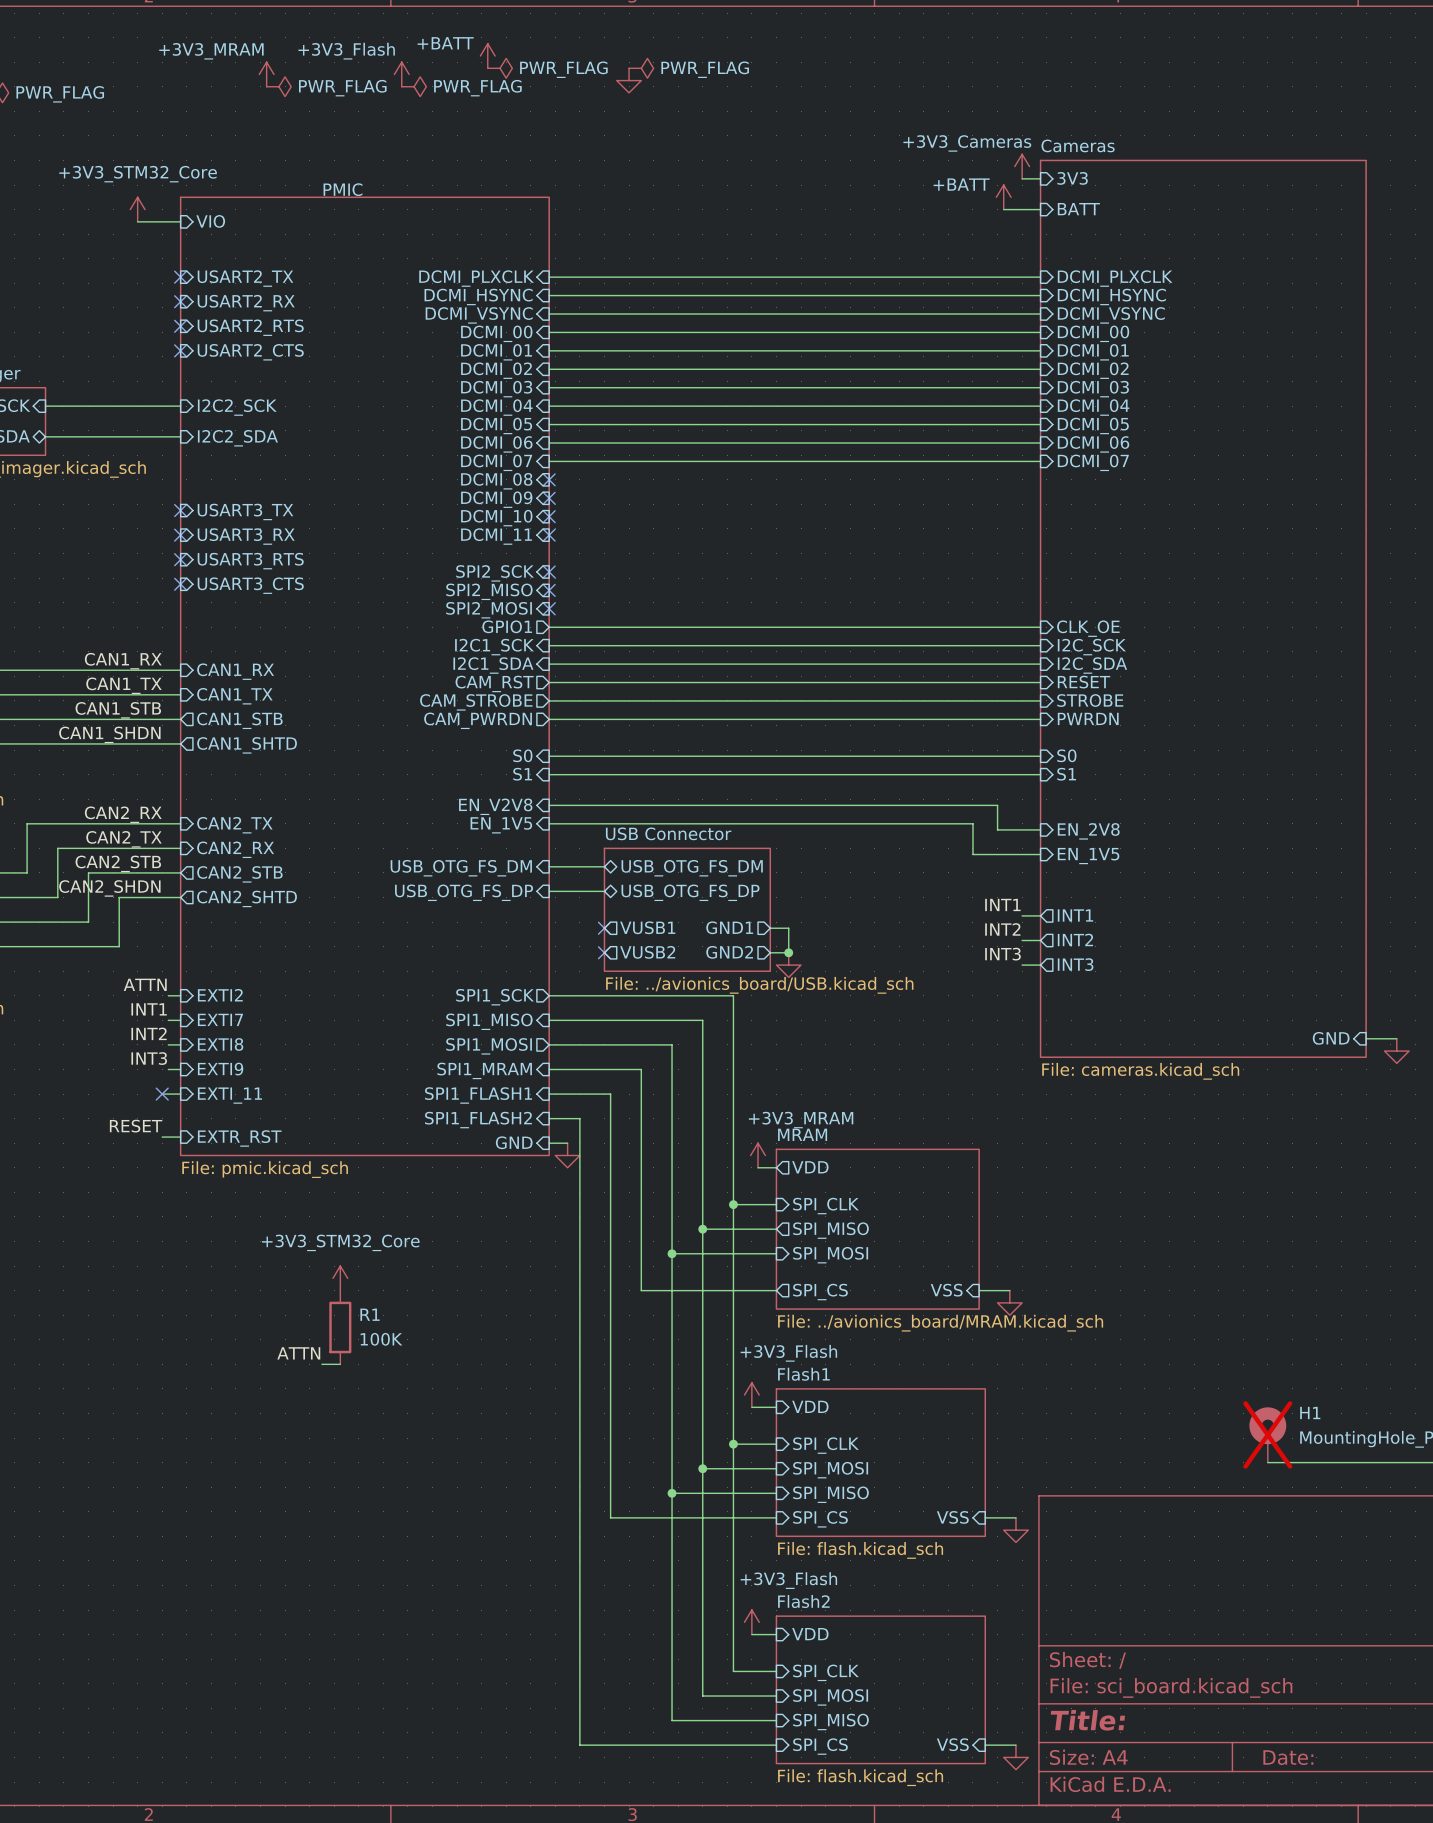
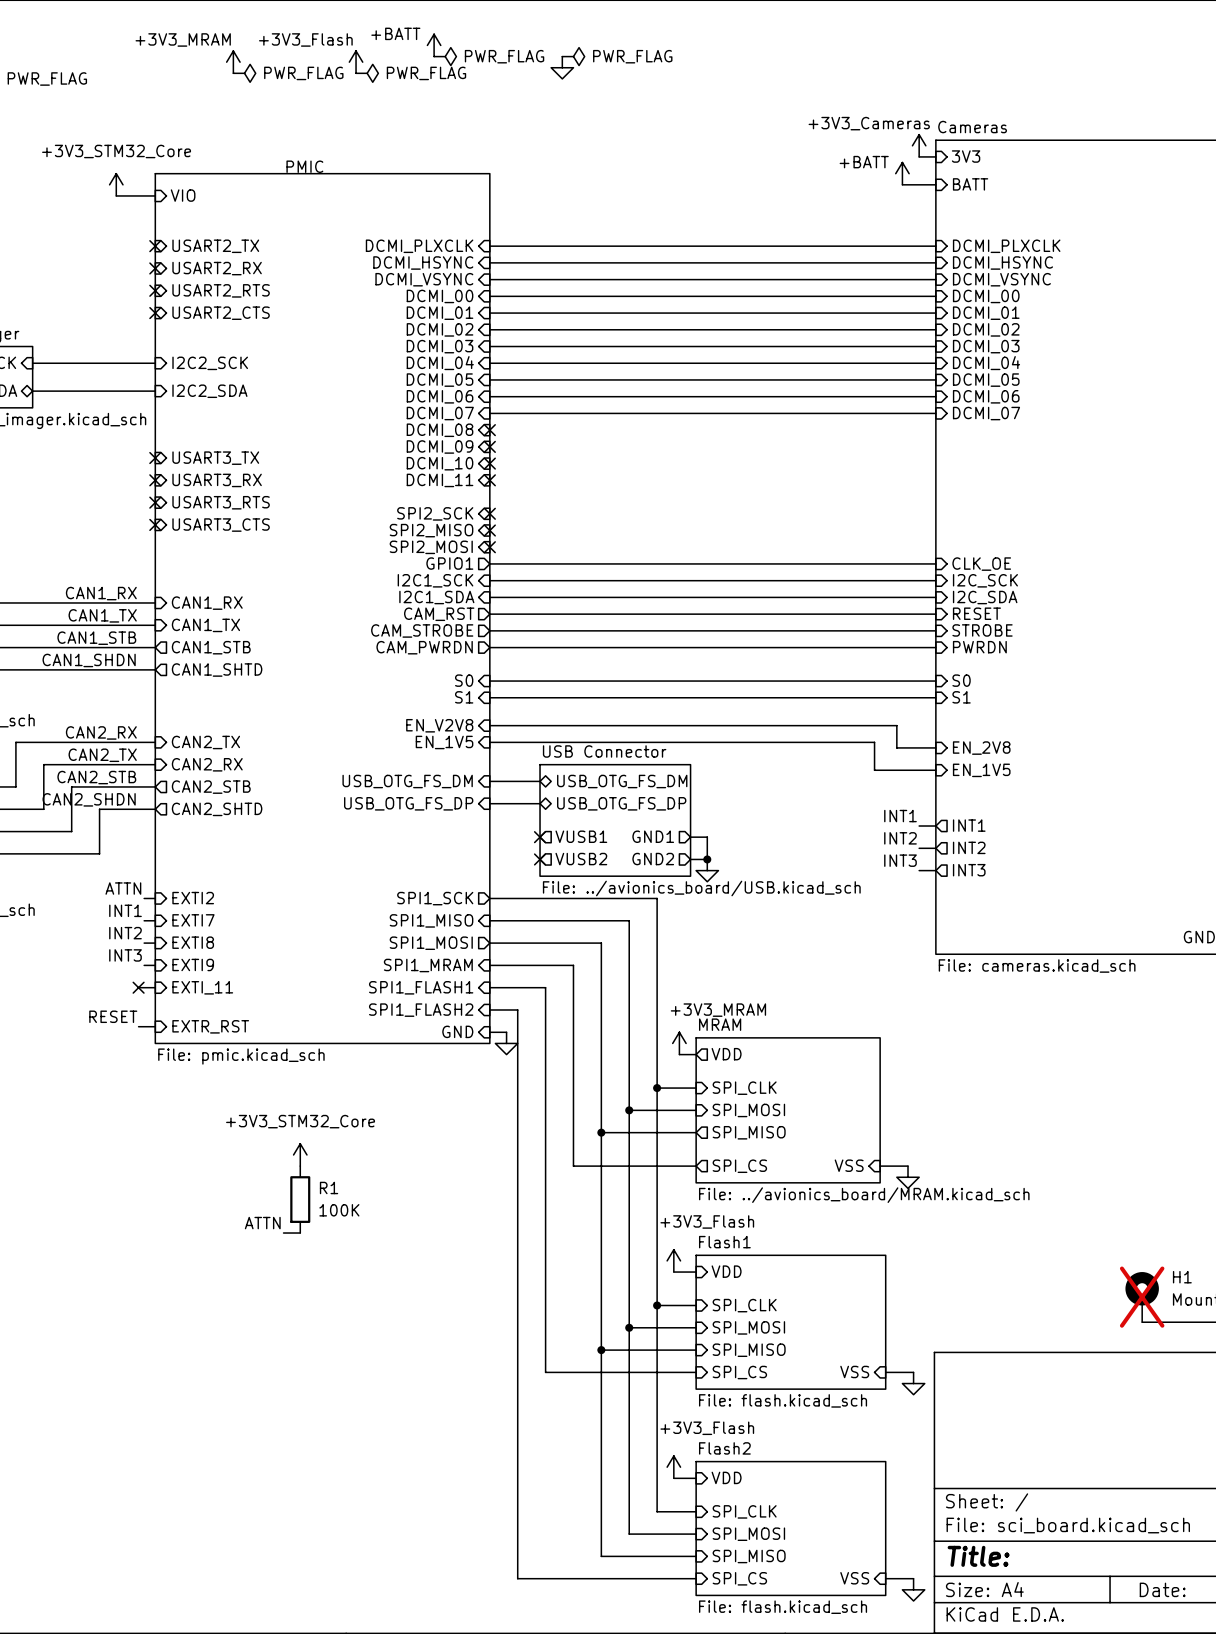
sheet pin shape: output (830, 1230) -> input (748, 1110)
sheet pin: SPI_MISO (830, 1230) -> SPI_MOSI (748, 1110)
sheet pin shape: input (830, 1255) -> output (749, 1132)
sheet pin: SPI_MOSI (830, 1255) -> SPI_MISO (749, 1132)

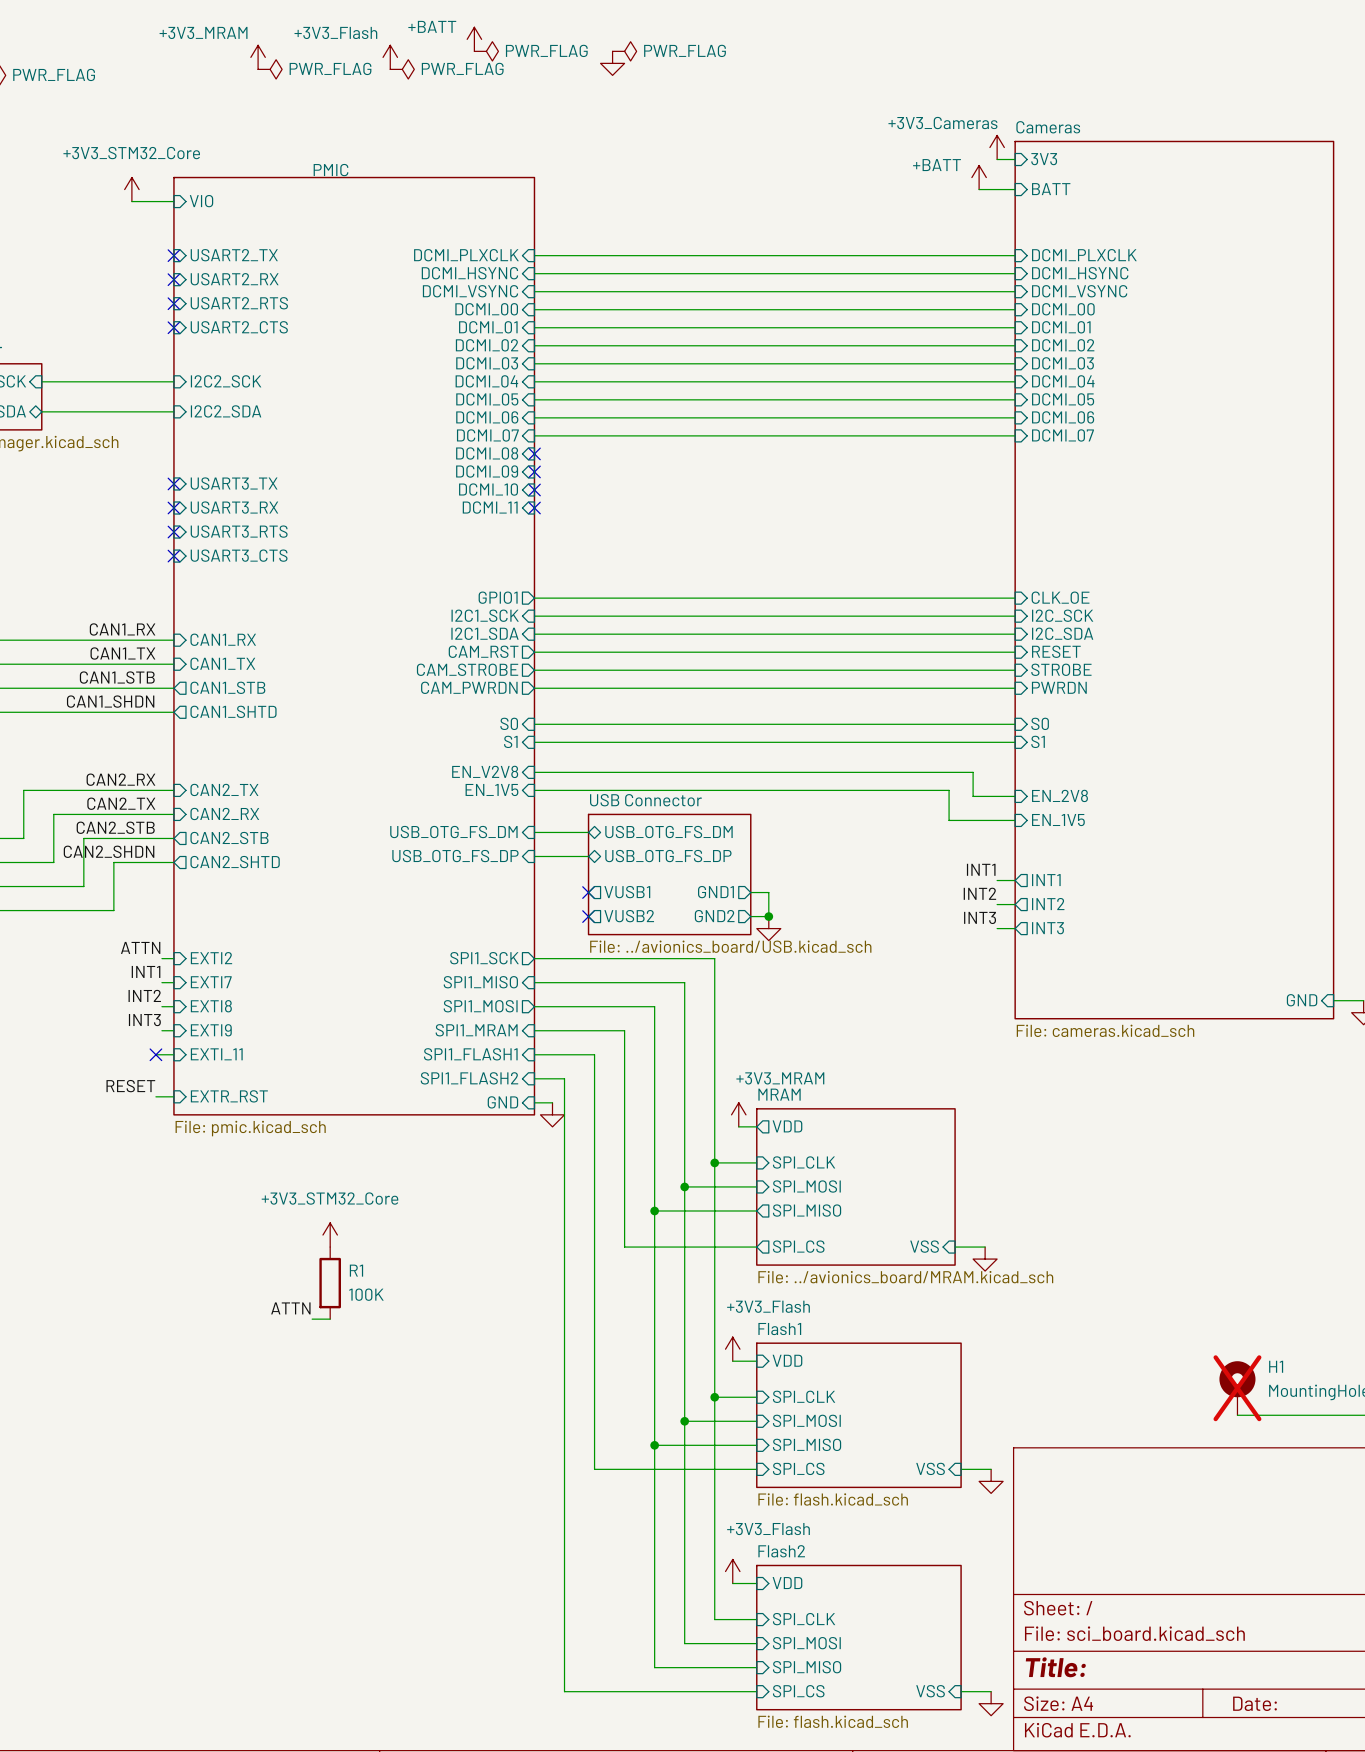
sheet pin: SPI2_SCK (435, 513) -> none
no-connect mark: (489, 513) -> none
sheet pin: SPI2_MISO (431, 530) -> none
no-connect mark: (489, 530) -> none
sheet pin: SPI2_MOSI (431, 547) -> none
no-connect mark: (489, 547) -> none

